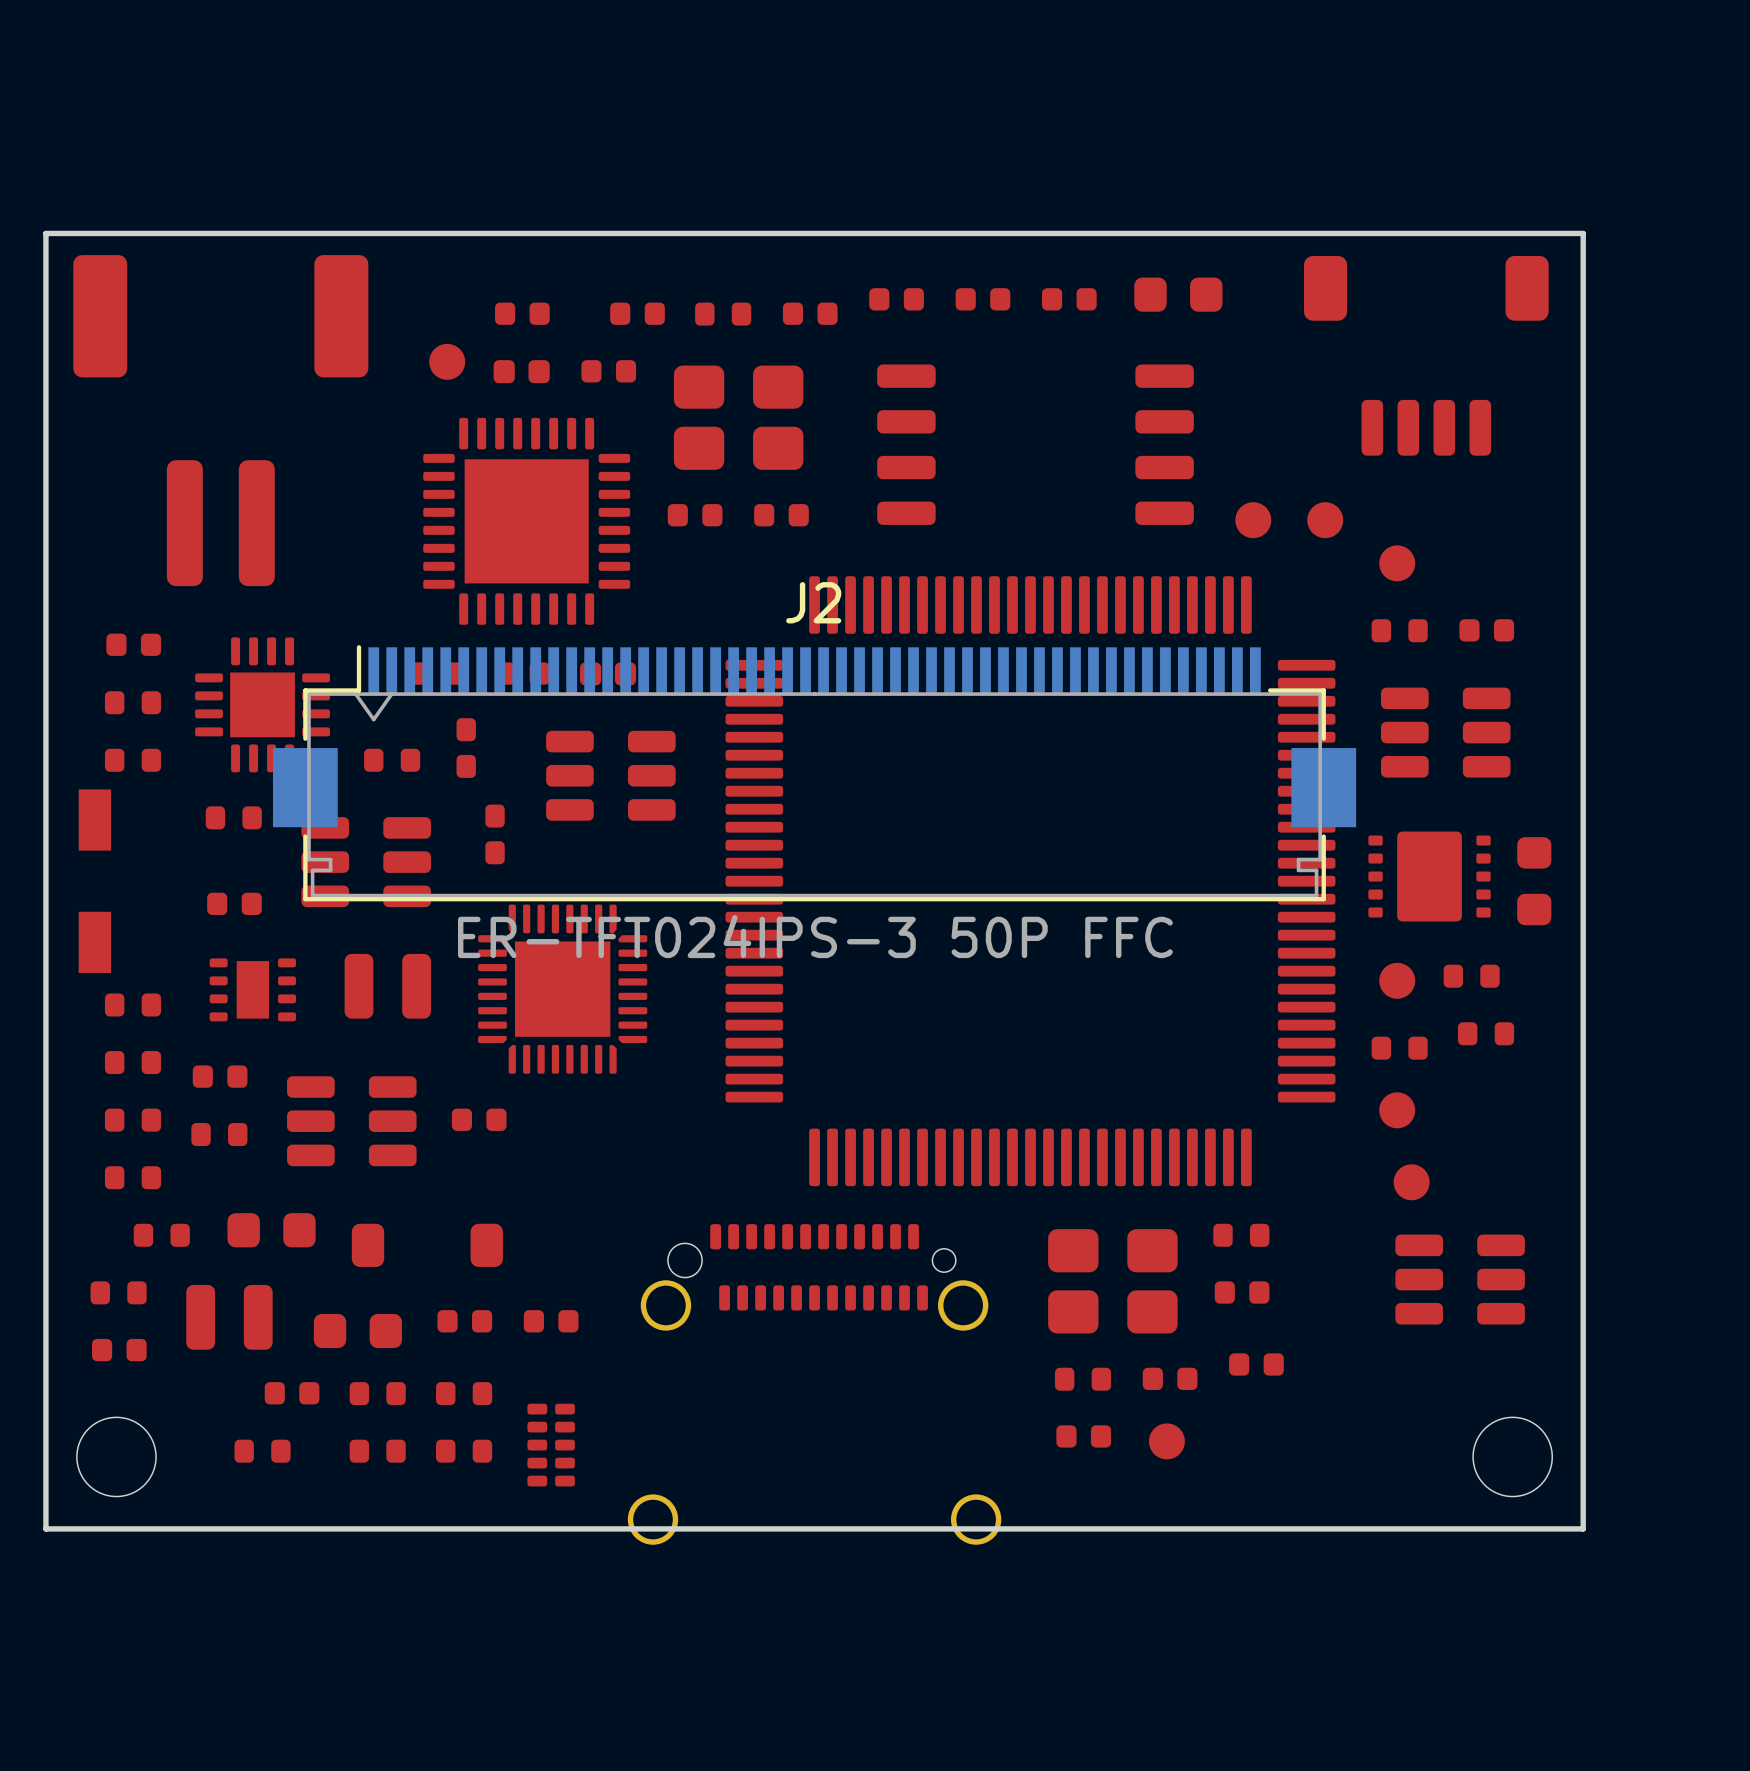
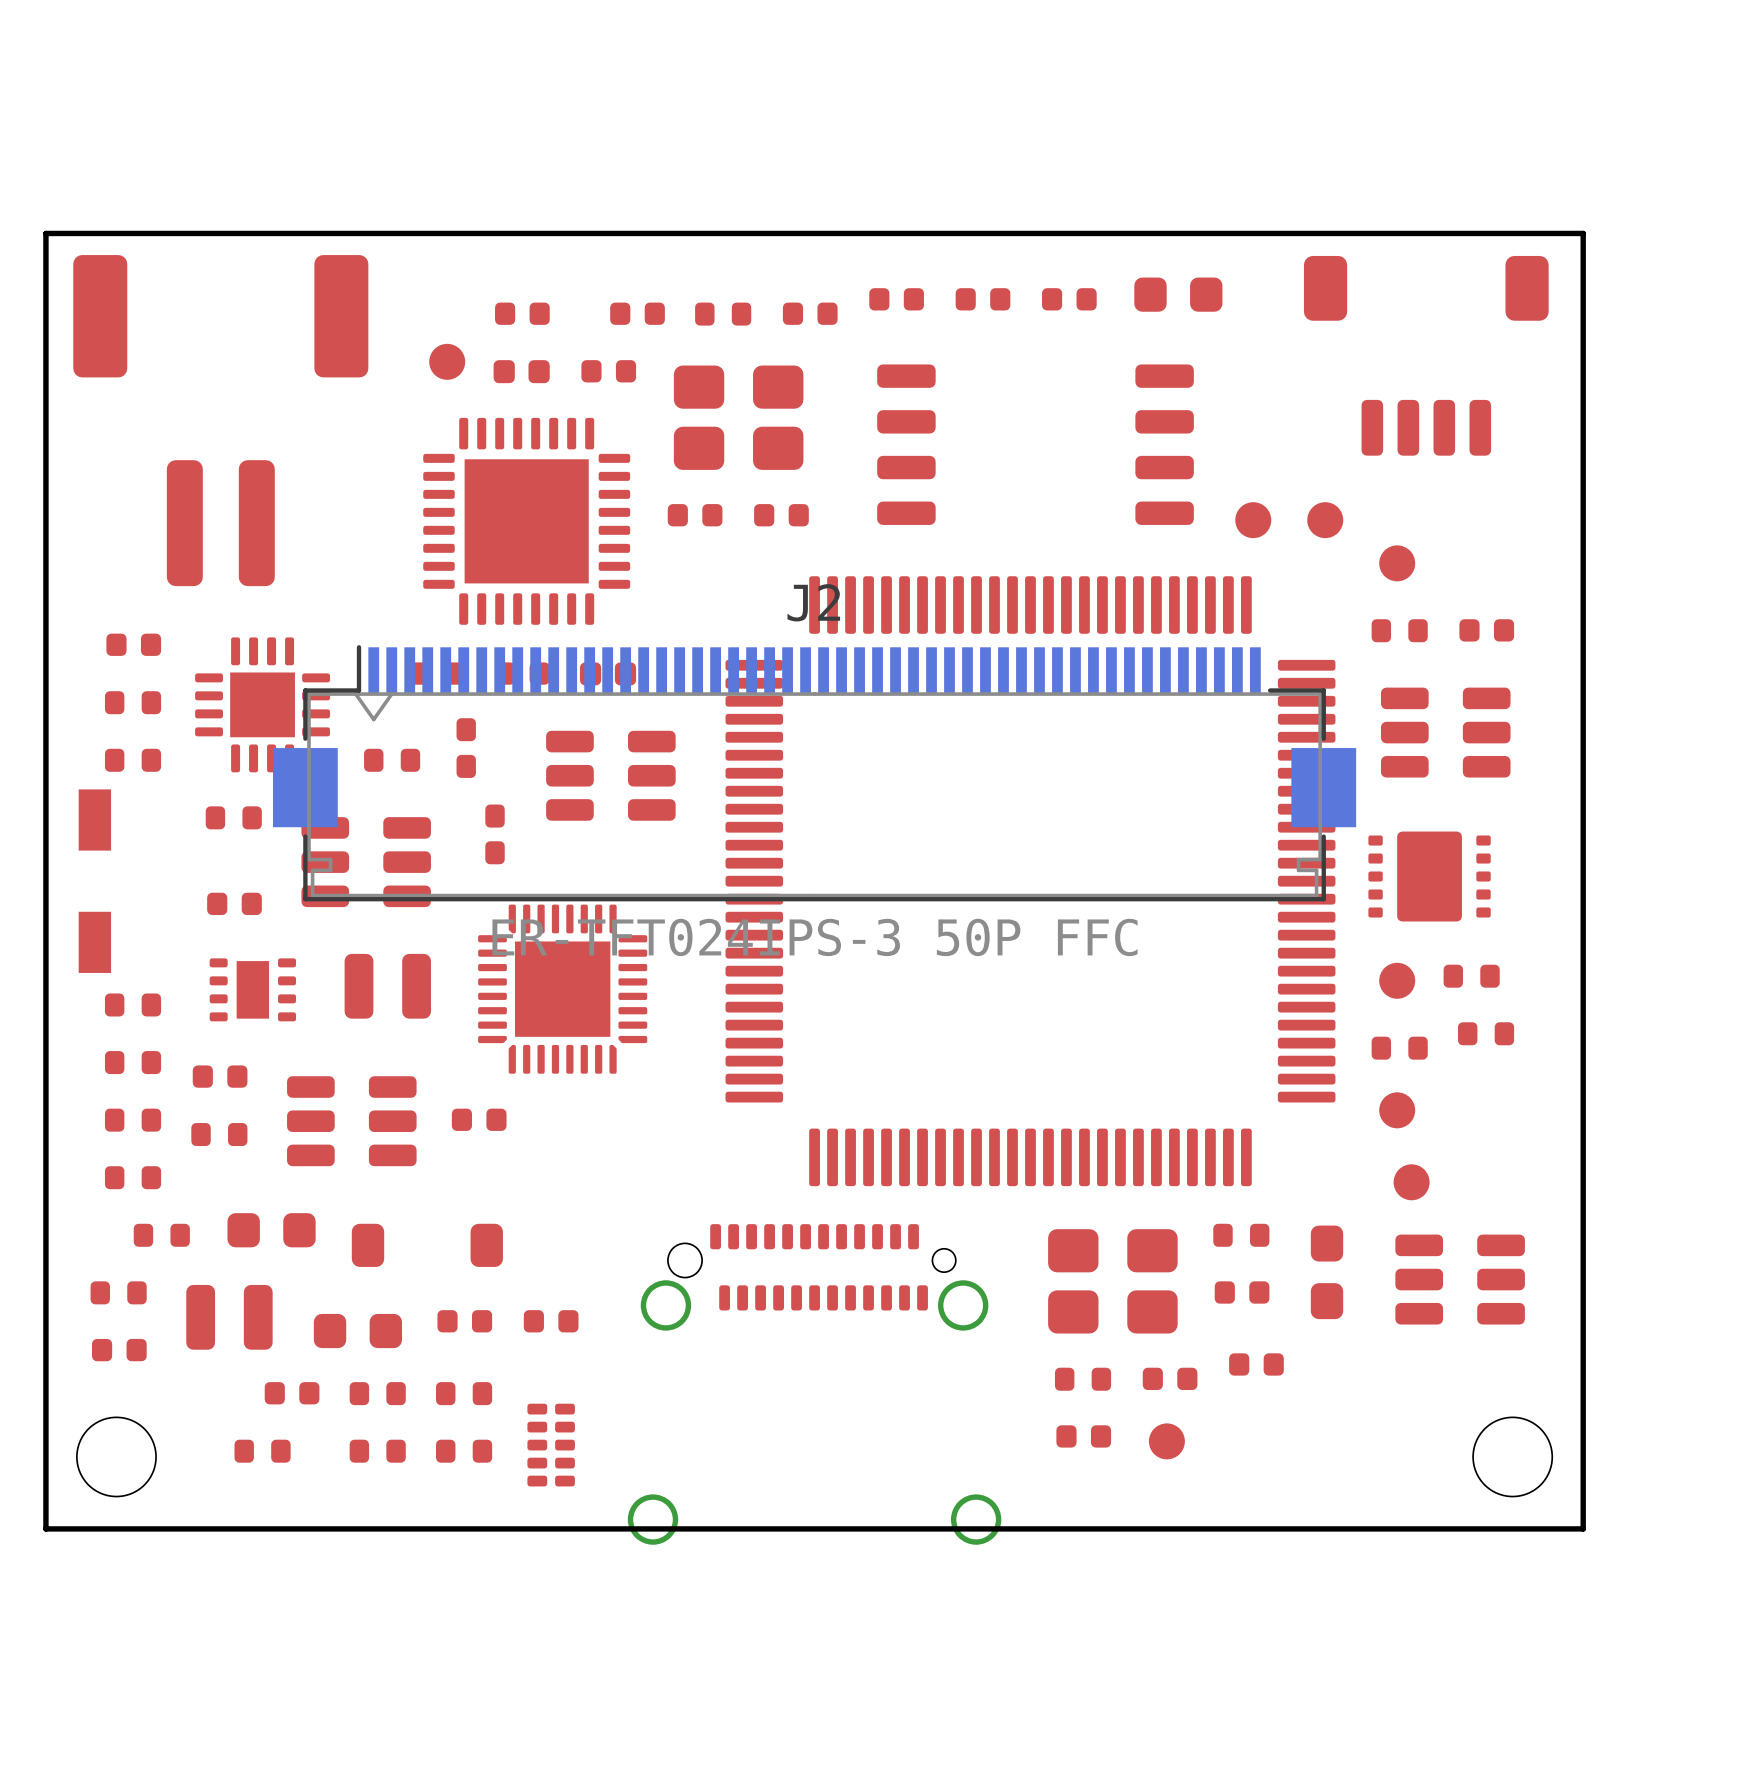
part: (1534, 881) -> none
part: none -> (1326, 1272)

